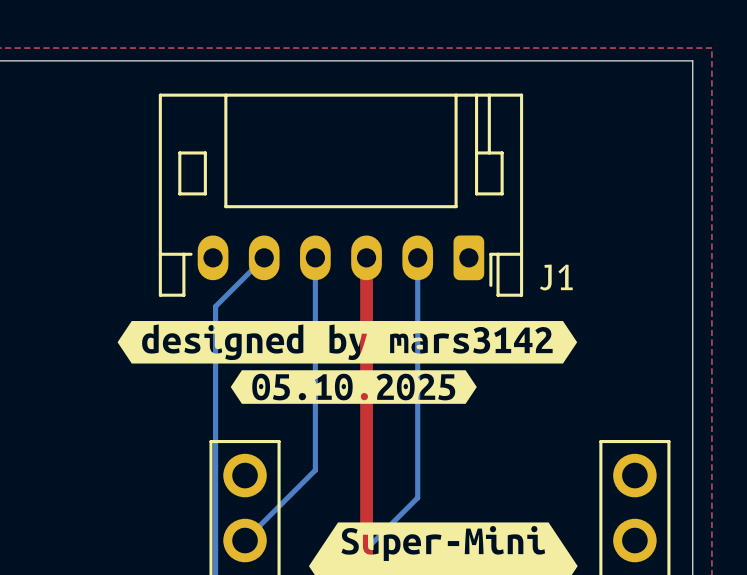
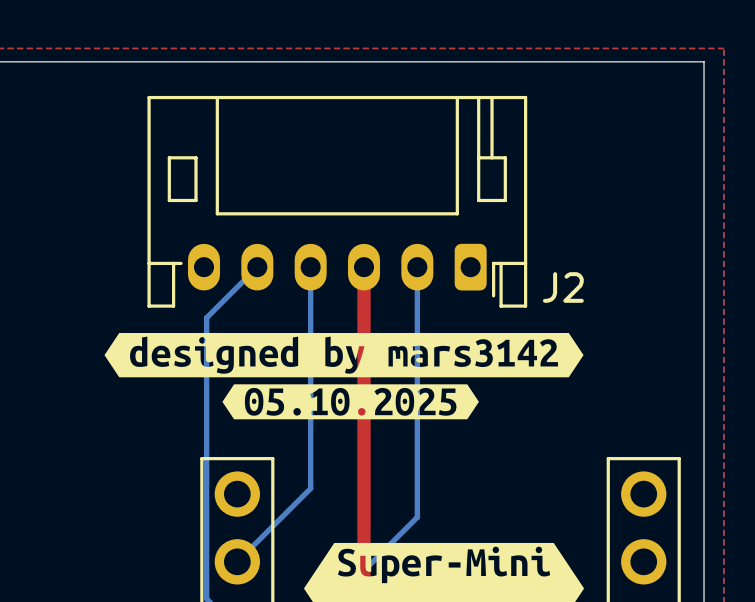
J1 name: J1 (556, 277) -> J2 (563, 287)

